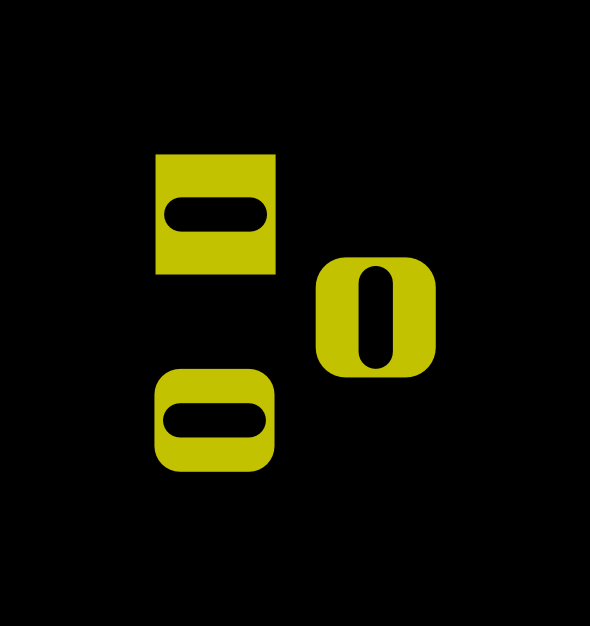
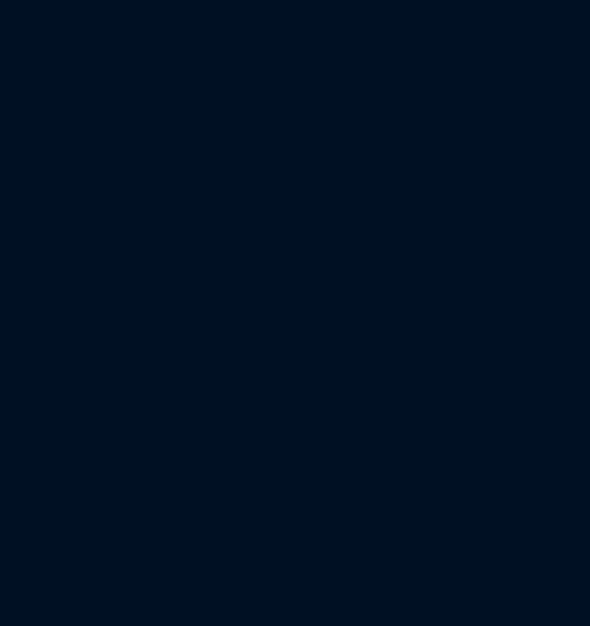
part: (295, 313) -> none

